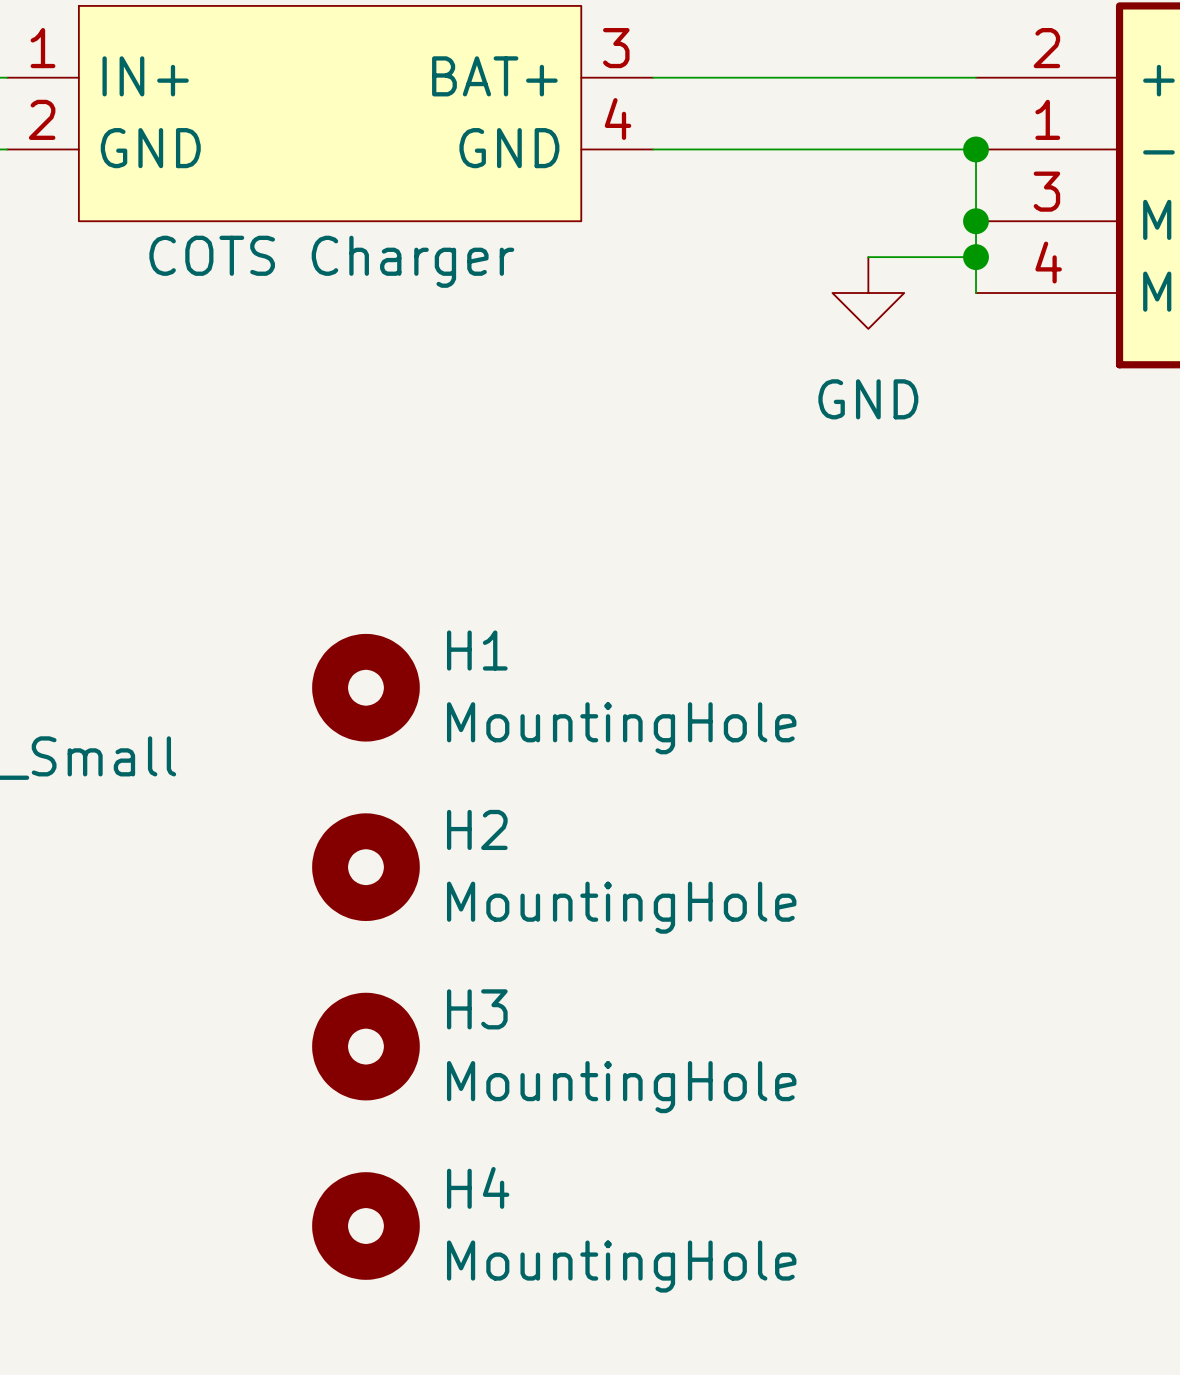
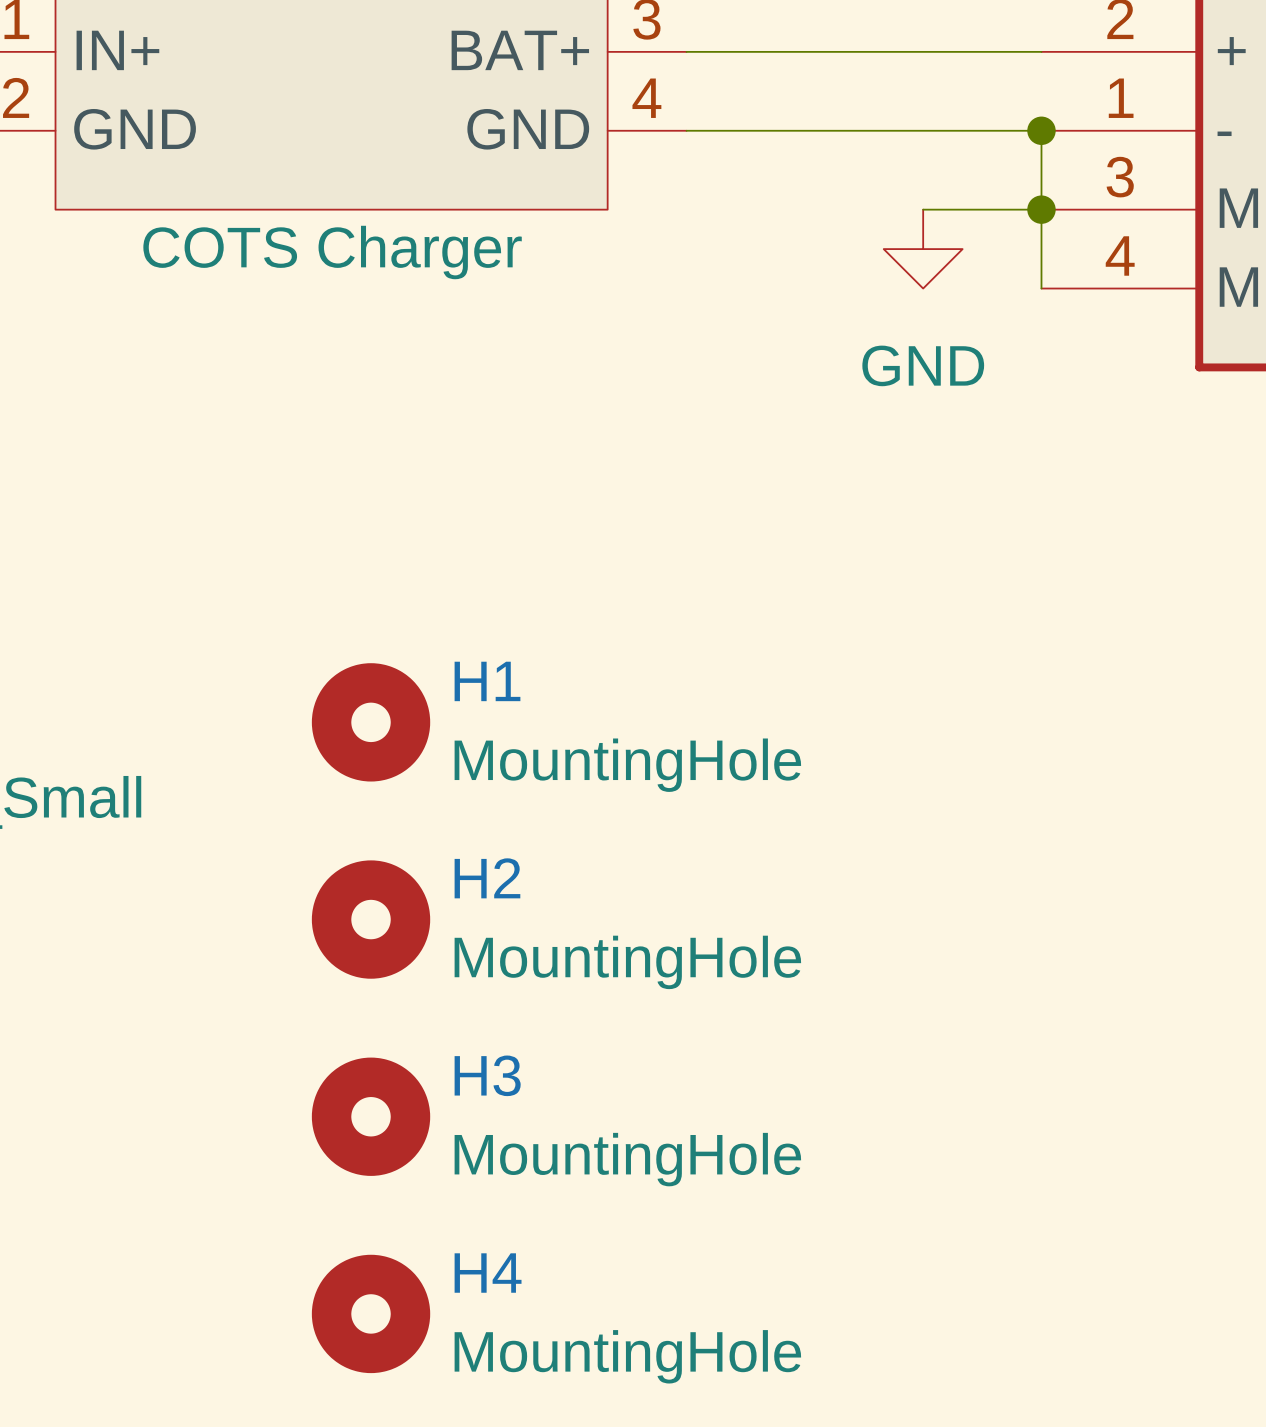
wire: (868, 257) (976, 257) -> (923, 209) (1041, 209)
junction: (976, 257) -> none
power symbol position: GND (868, 293) -> GND (923, 249)

